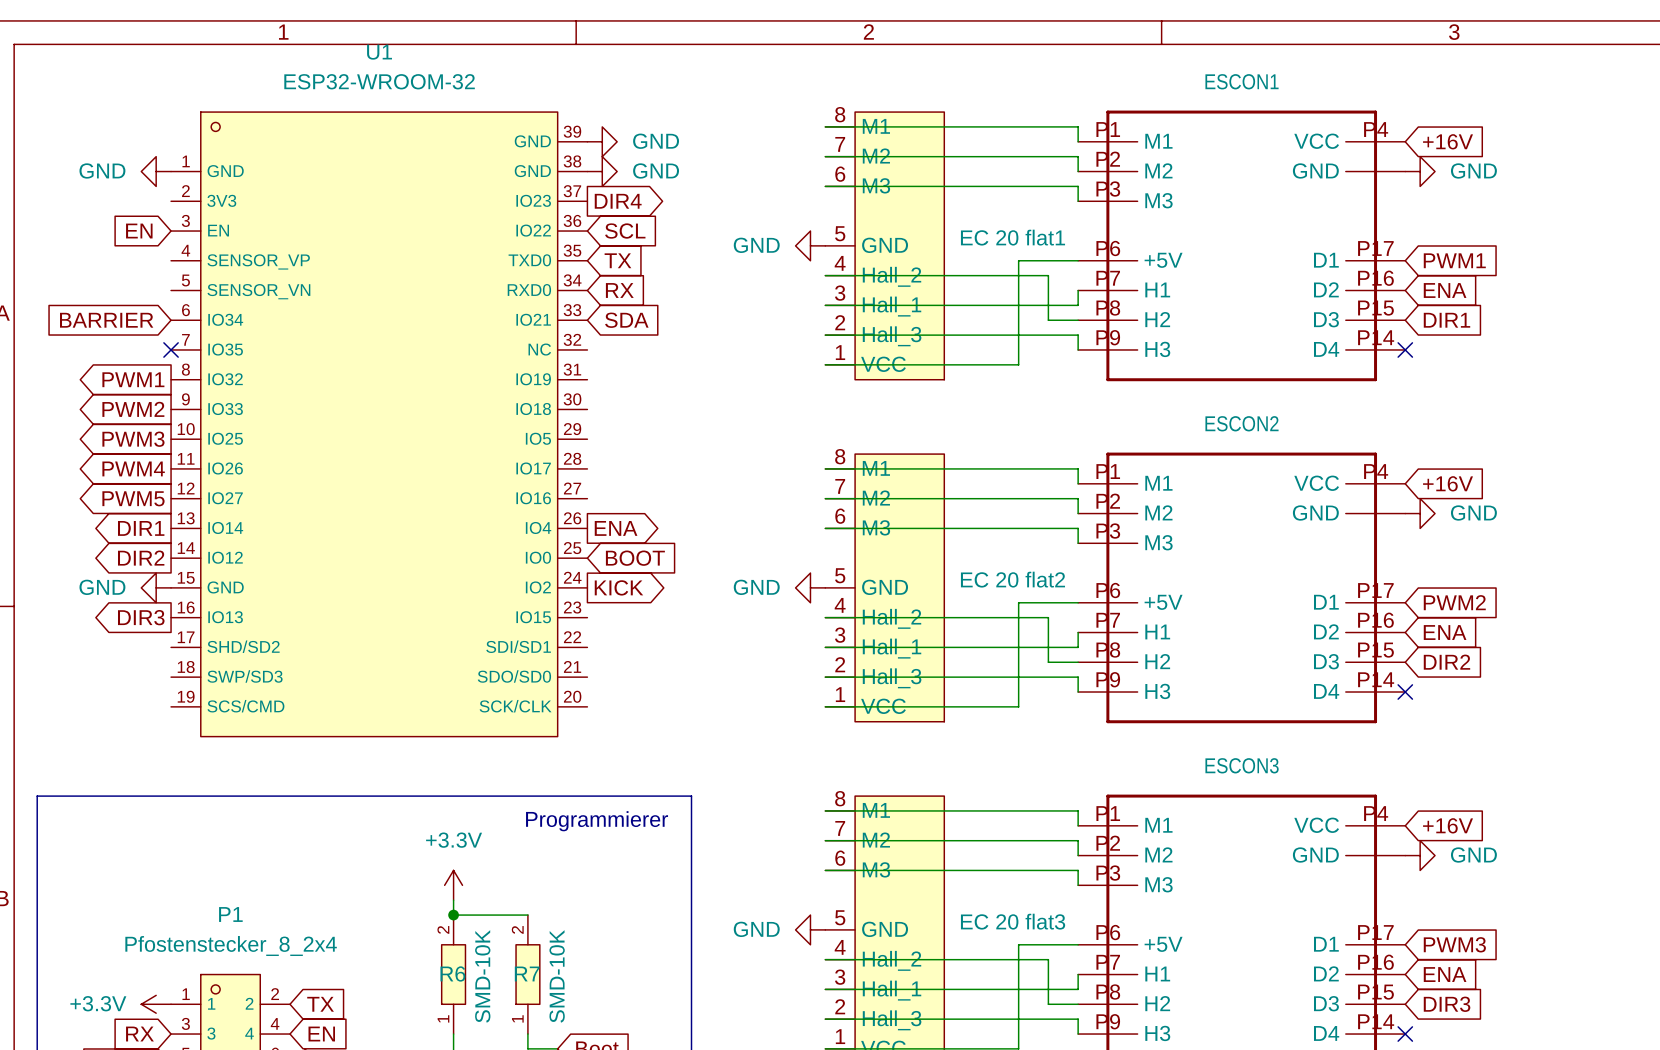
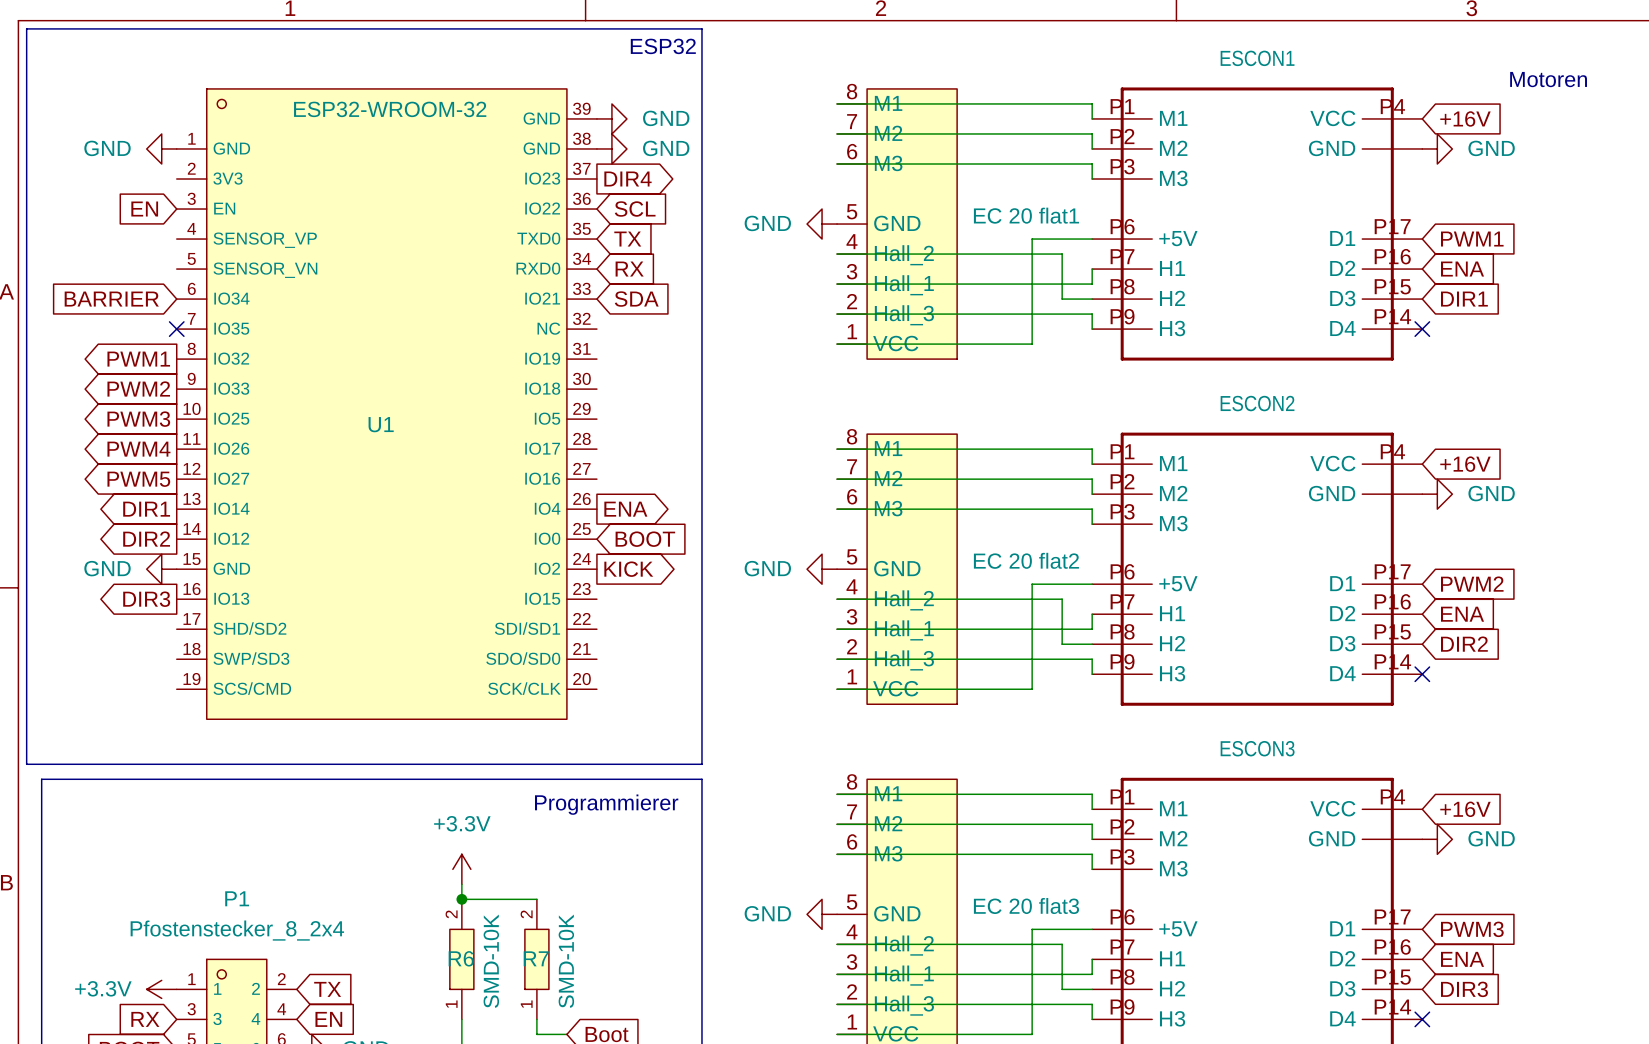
line: none -> (26, 28) (701, 28) (701, 764) (26, 764) (26, 28)
U1 name position: U1 (379, 52) -> U1 (381, 424)
text: none -> ESP32 (663, 46)
U1 value position: ESP32-WROOM-32 (379, 81) -> ESP32-WROOM-32 (390, 109)
text: none -> Motoren (1548, 79)

